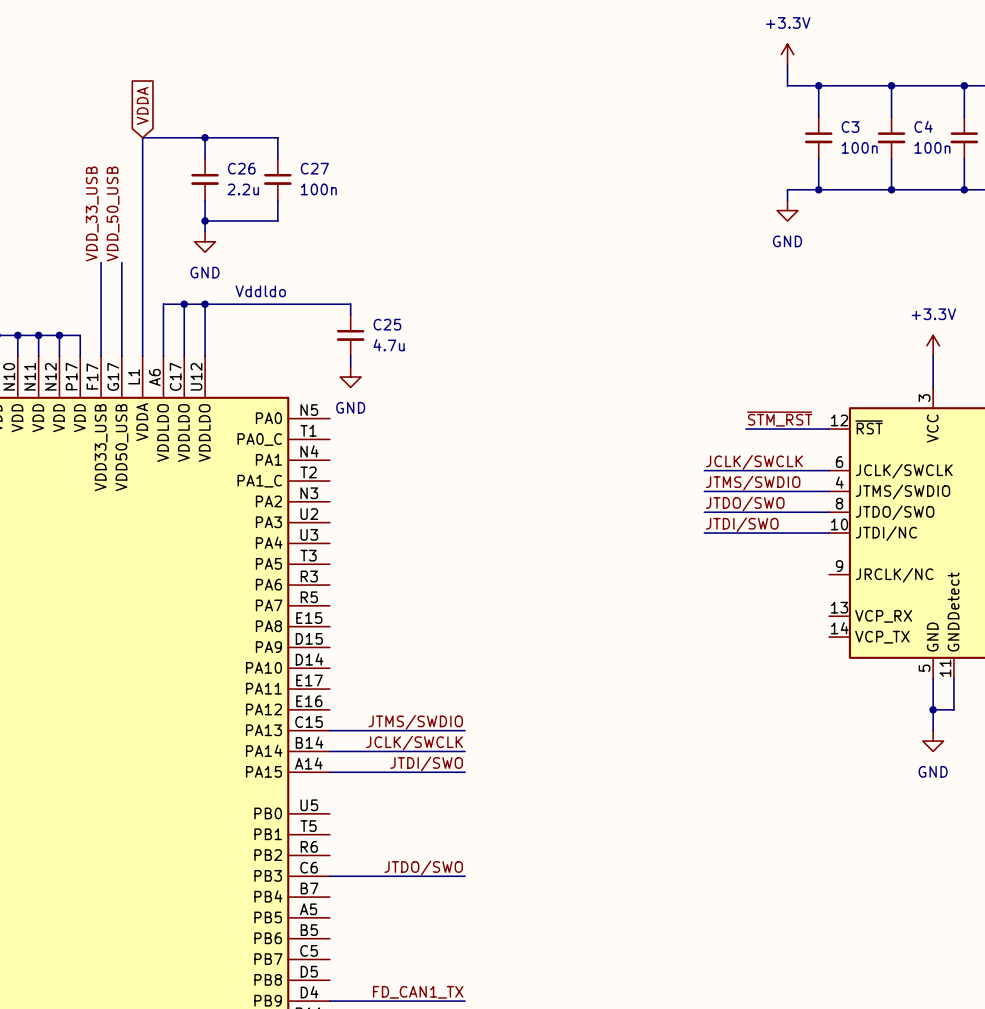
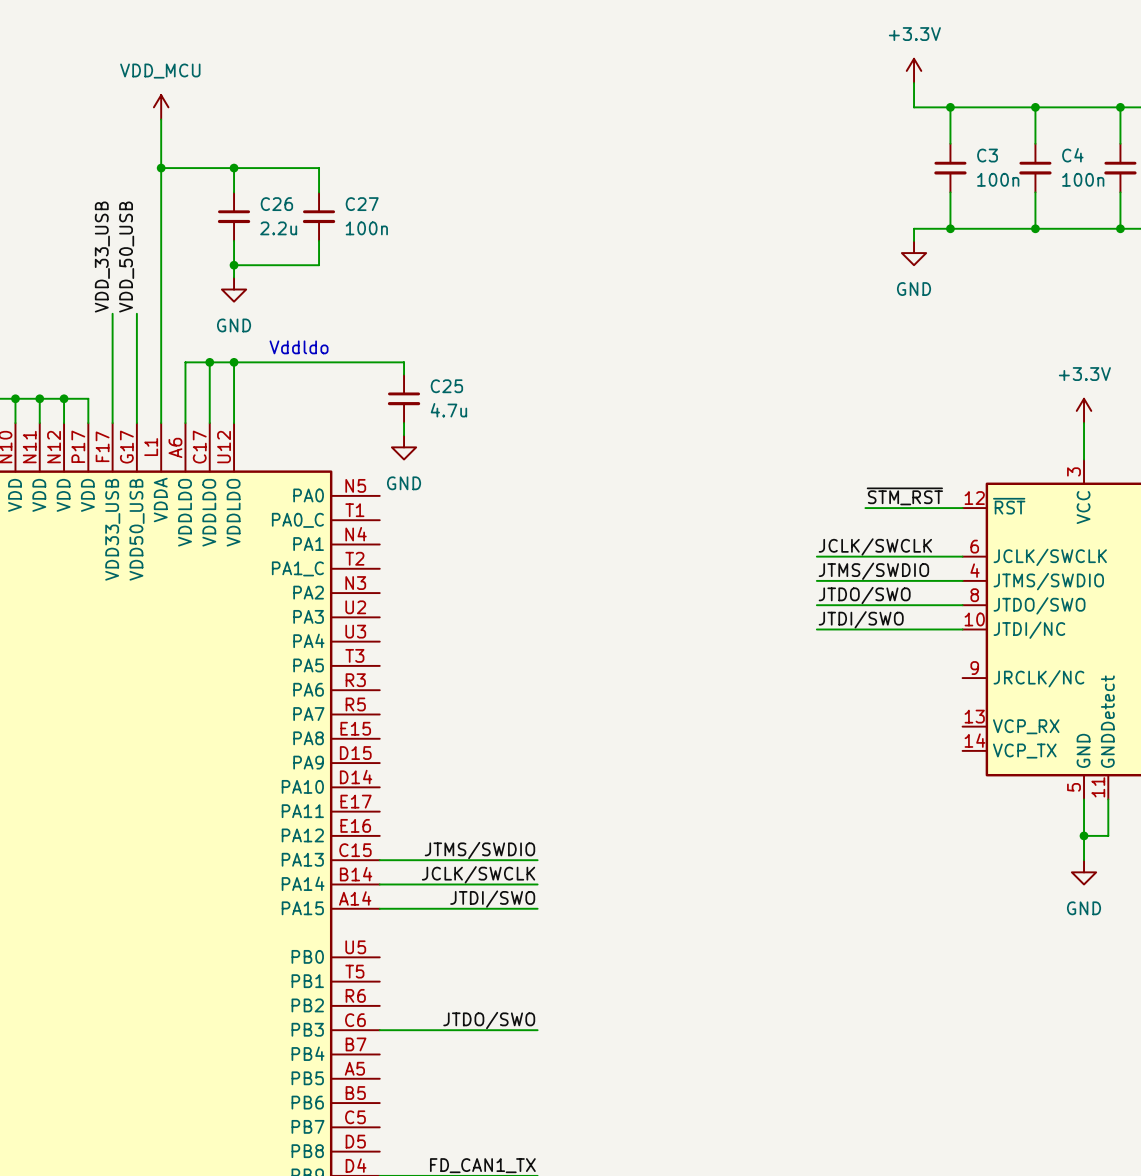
power symbol: none -> VDD_MCU (161, 107)
wire: none -> (161, 119) (161, 168)
global label: VDDA (142, 105) -> none
junction: none -> (161, 168)

